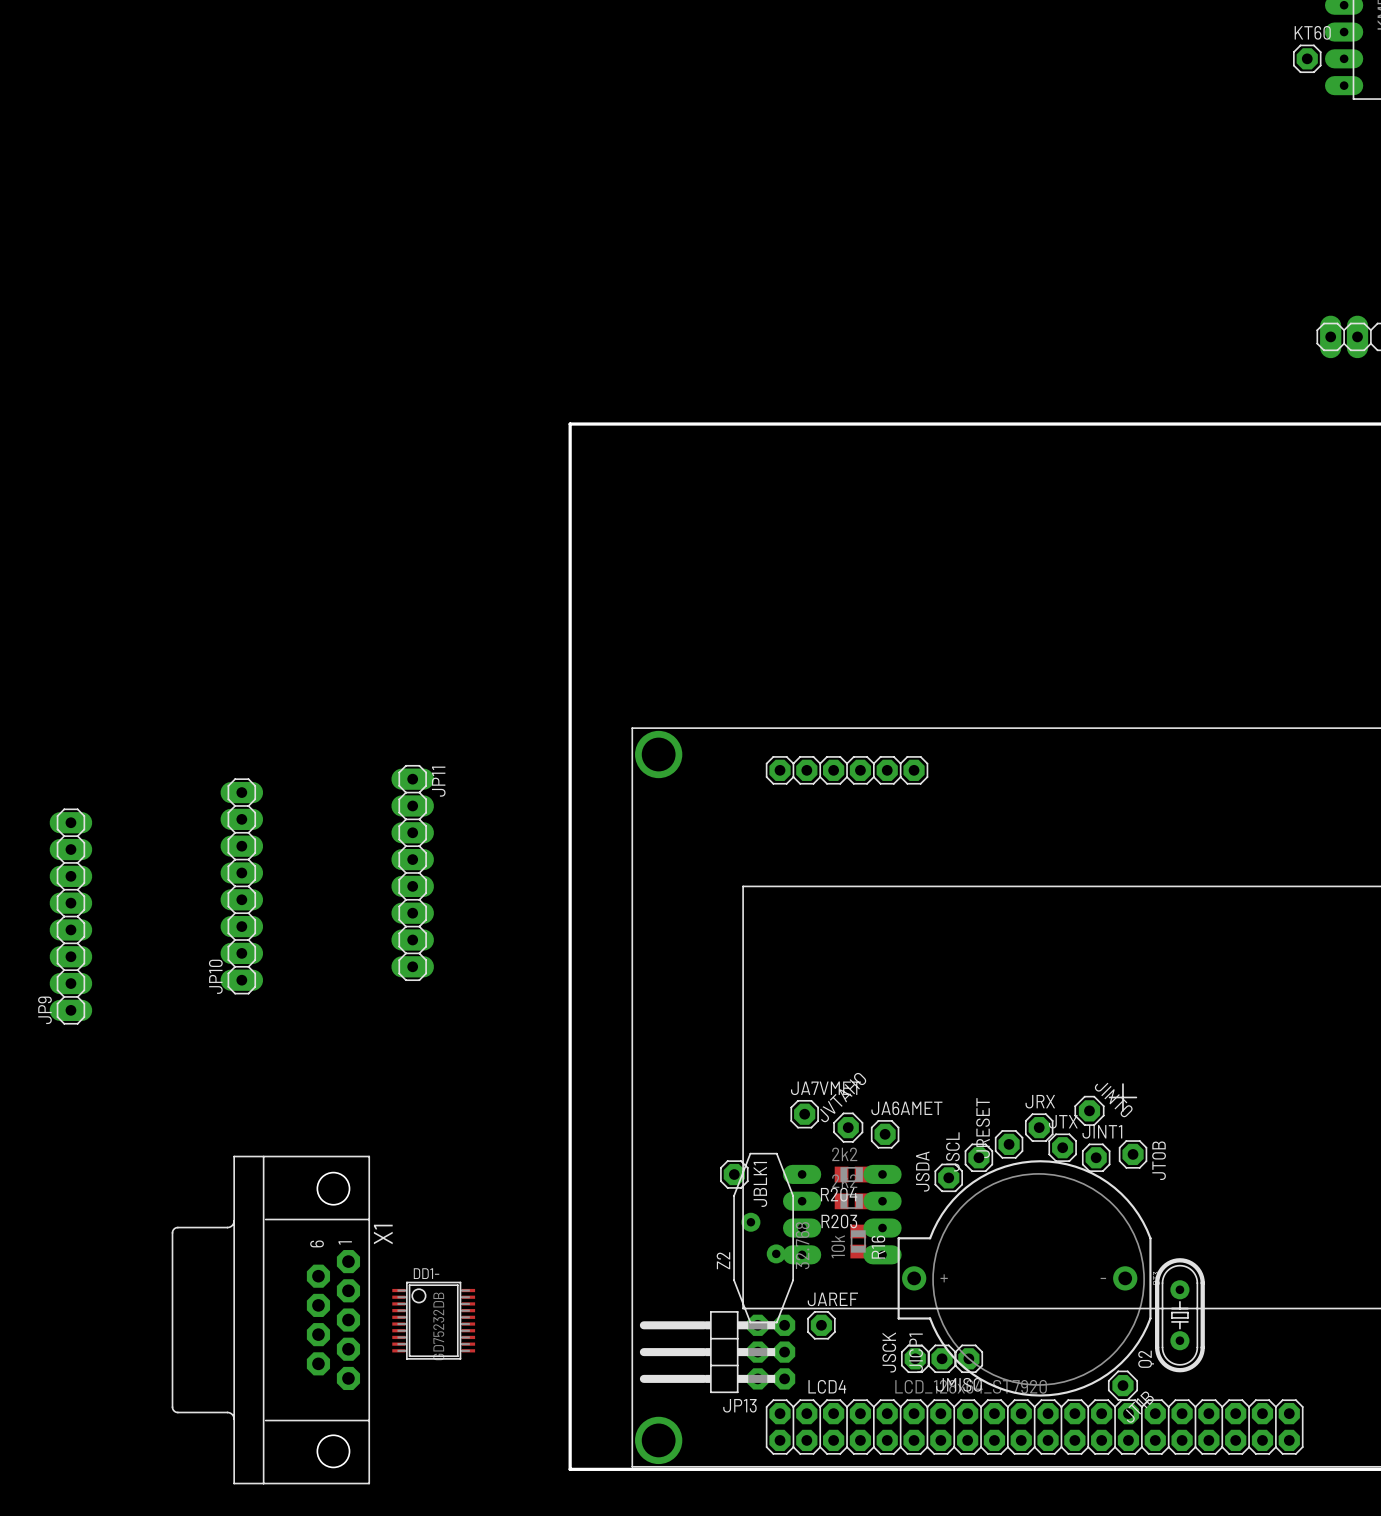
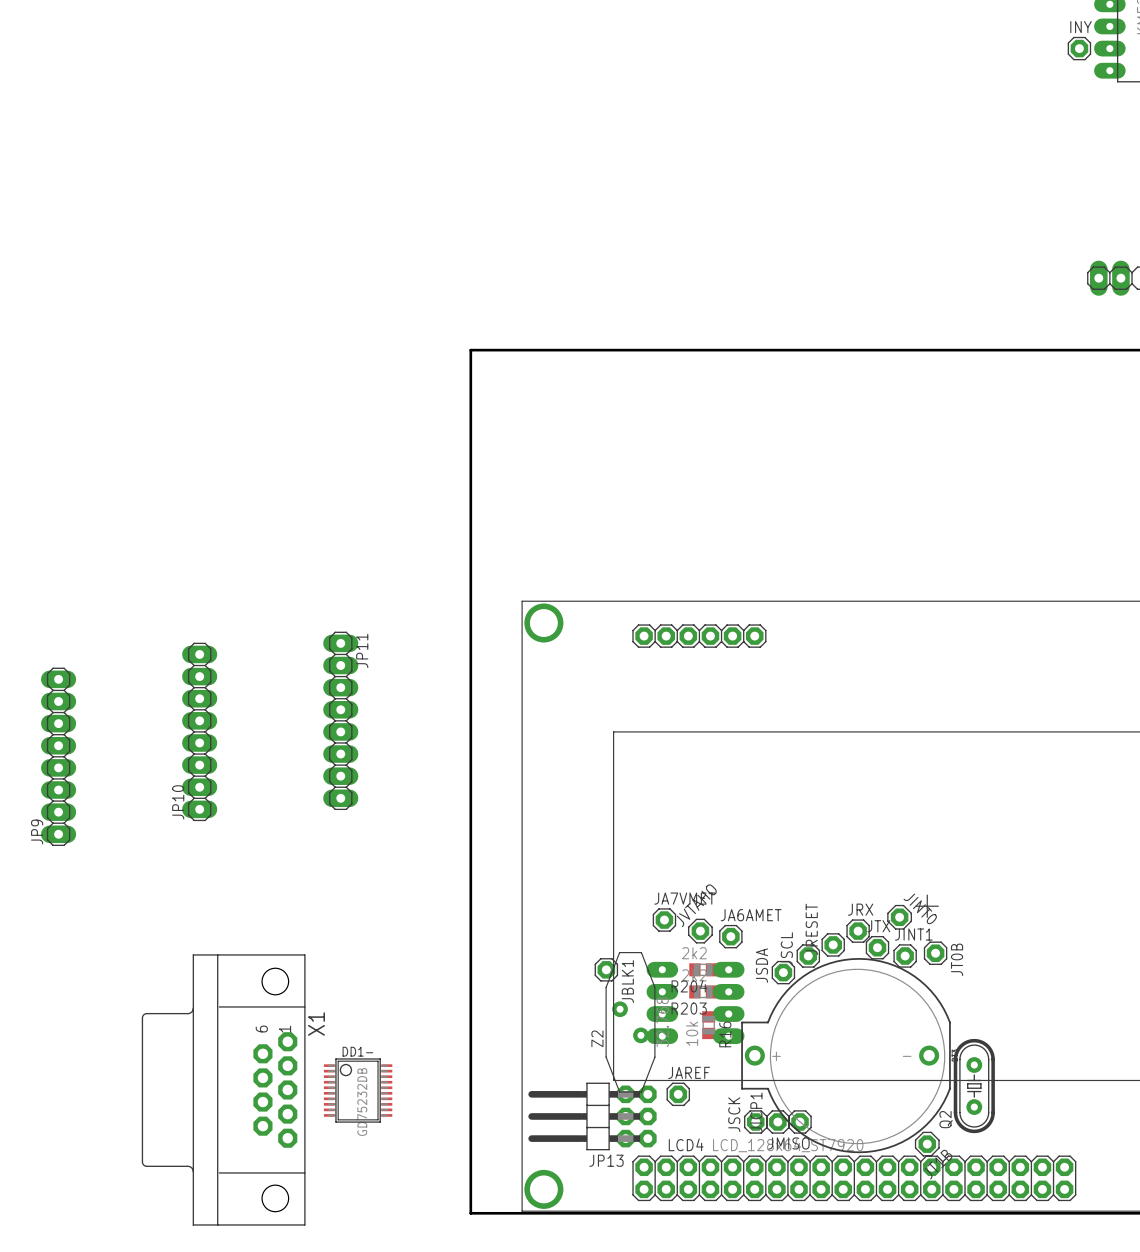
KT60 name: KT60 (1312, 32) -> INY (1081, 27)

